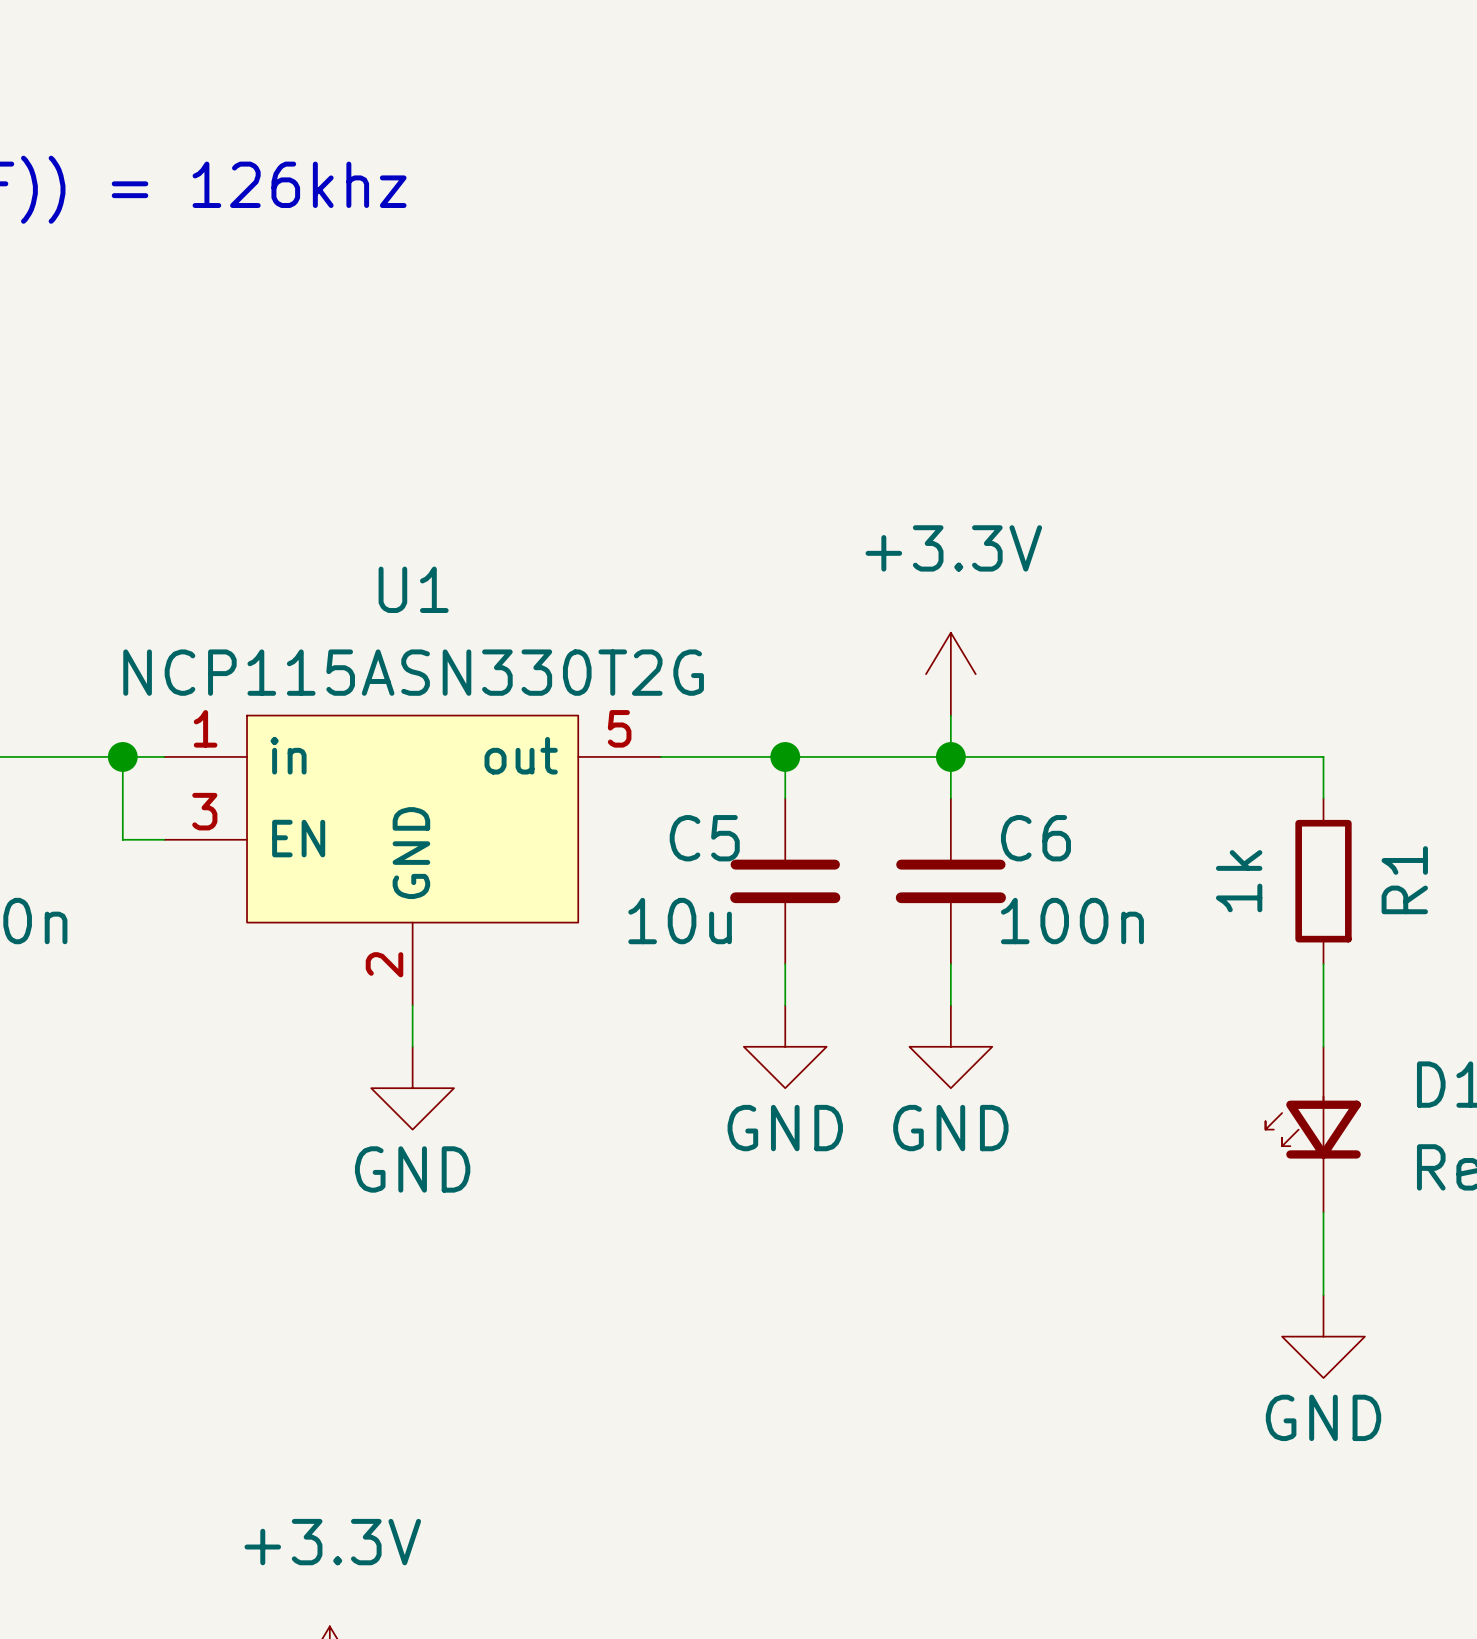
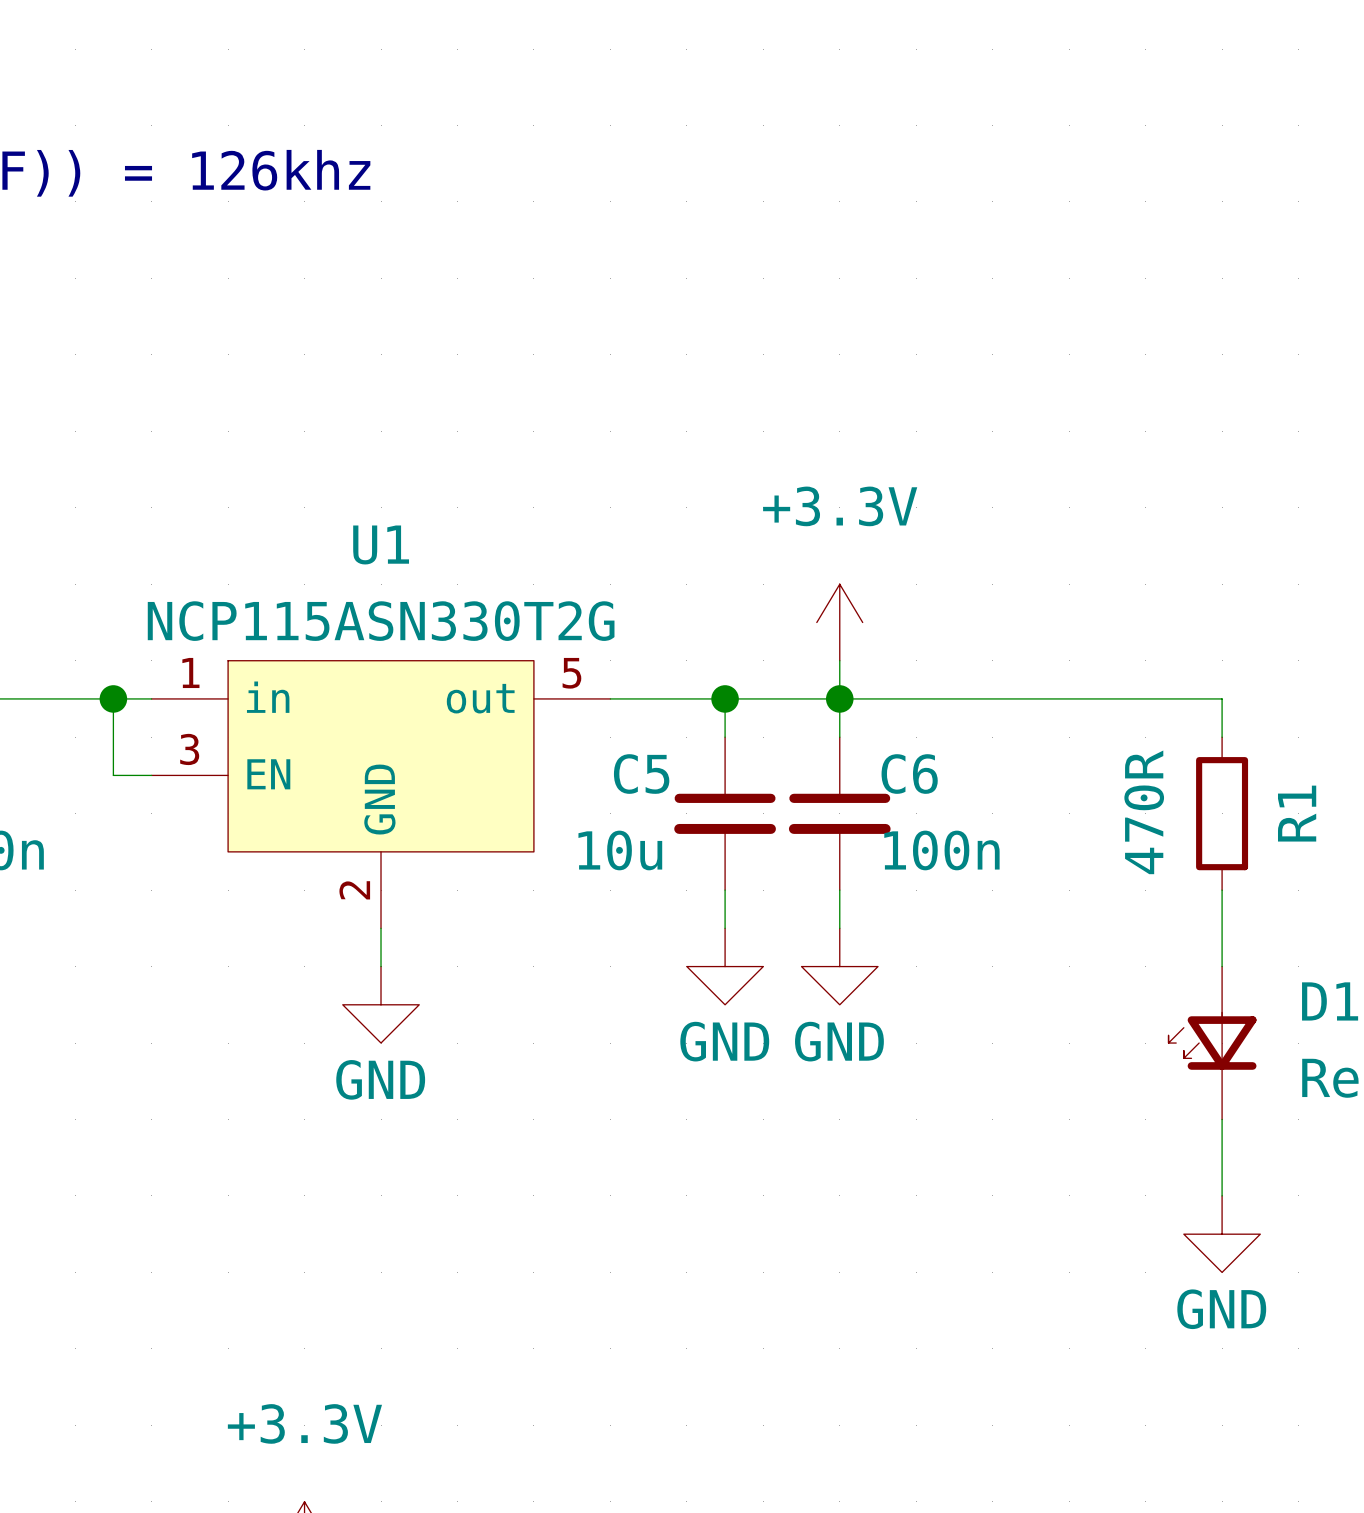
power symbol position: +3.3V (950, 674) -> +3.3V (839, 622)
wire: (950, 715) (950, 798) -> (839, 660) (839, 737)
junction position: (950, 756) -> (839, 698)
C6 position: (950, 881) -> (839, 813)
R1 value: 1k (1239, 881) -> 470R (1144, 812)
wire: (950, 963) (950, 1005) -> (839, 890) (839, 928)
power symbol position: GND (950, 1046) -> GND (839, 966)

